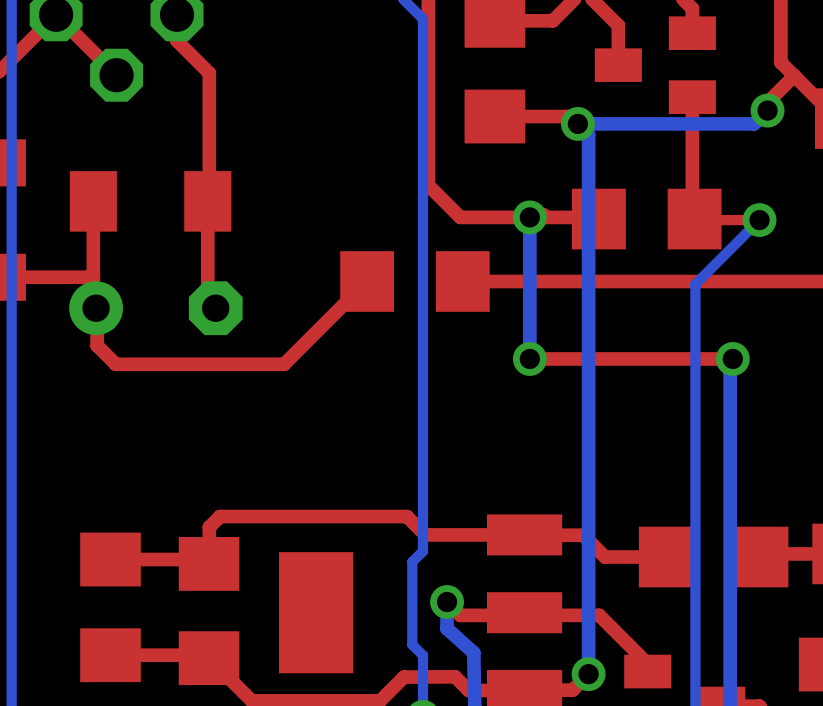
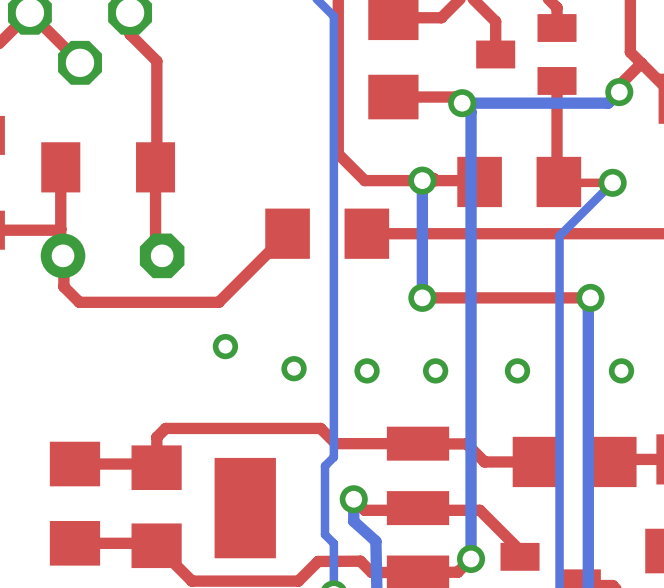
via: none -> (225, 346)
via: none -> (294, 368)
via: none -> (367, 370)
via: none -> (435, 370)
via: none -> (517, 370)
via: none -> (621, 370)

